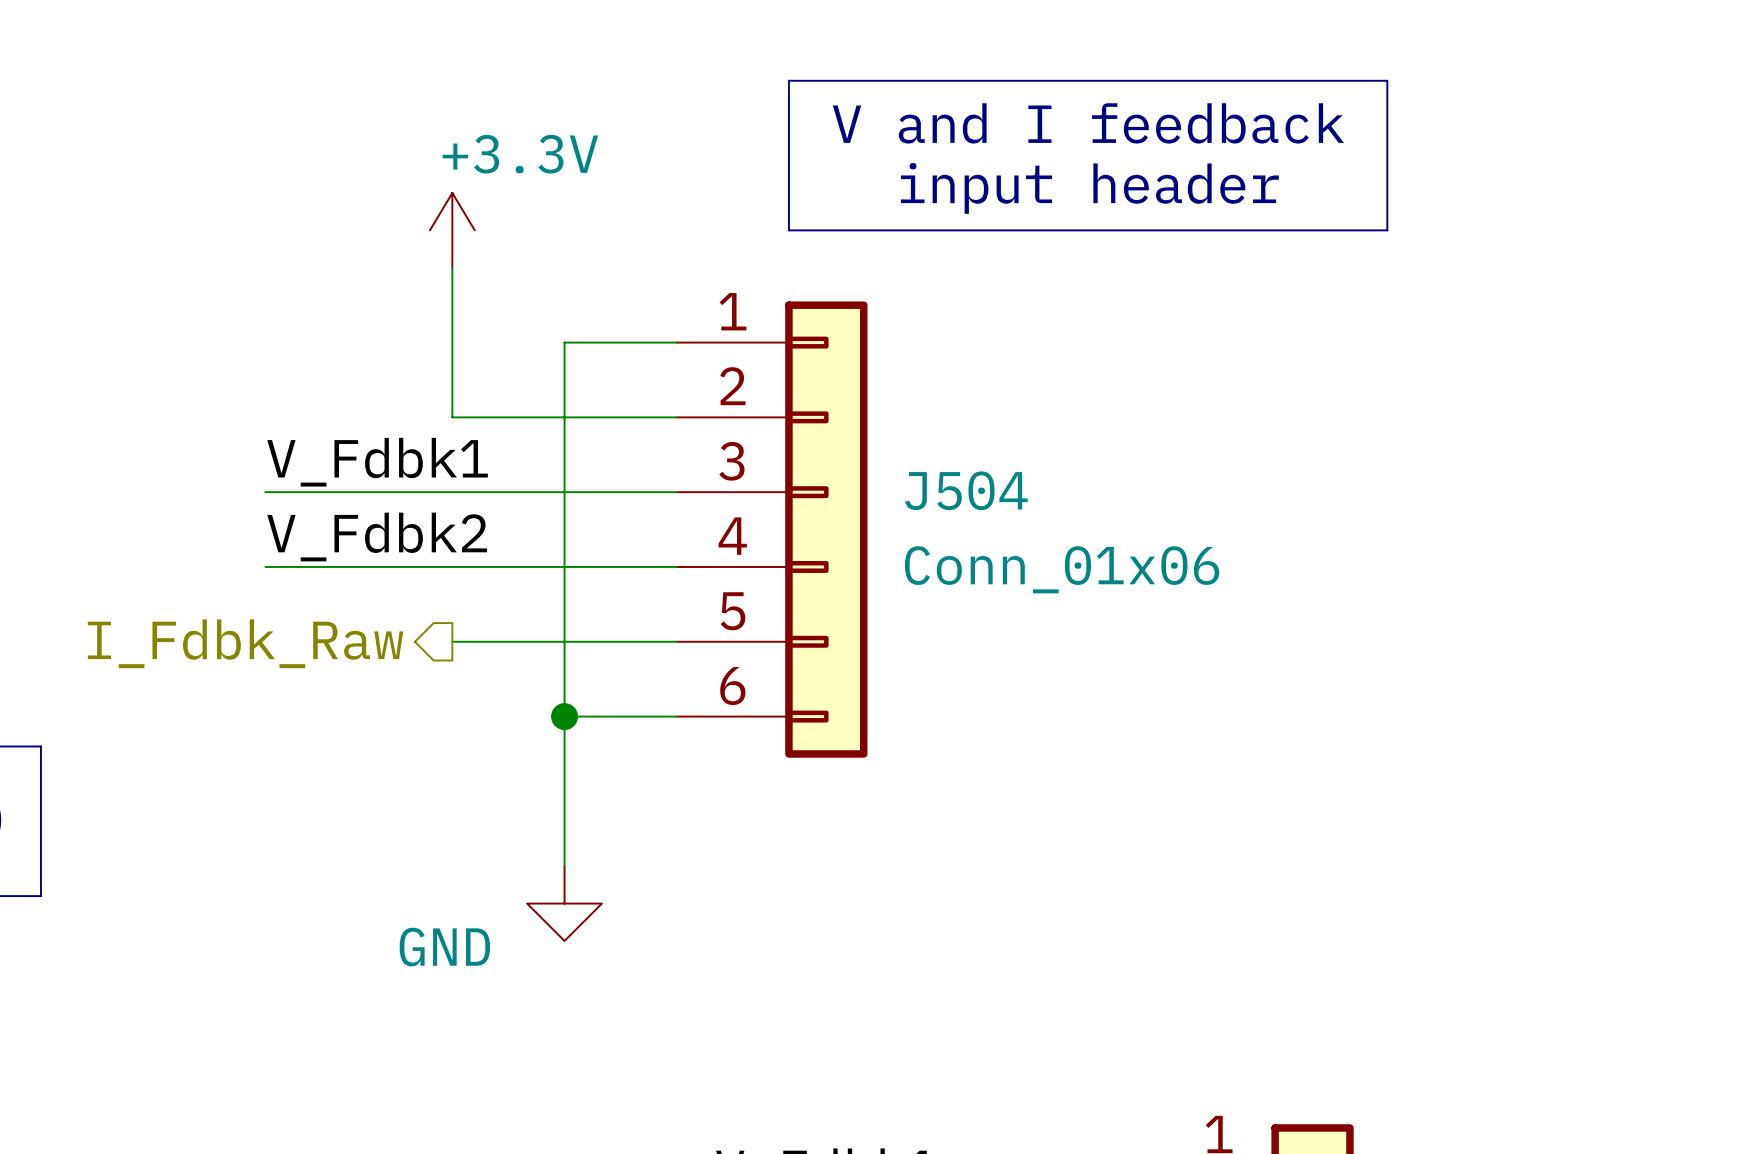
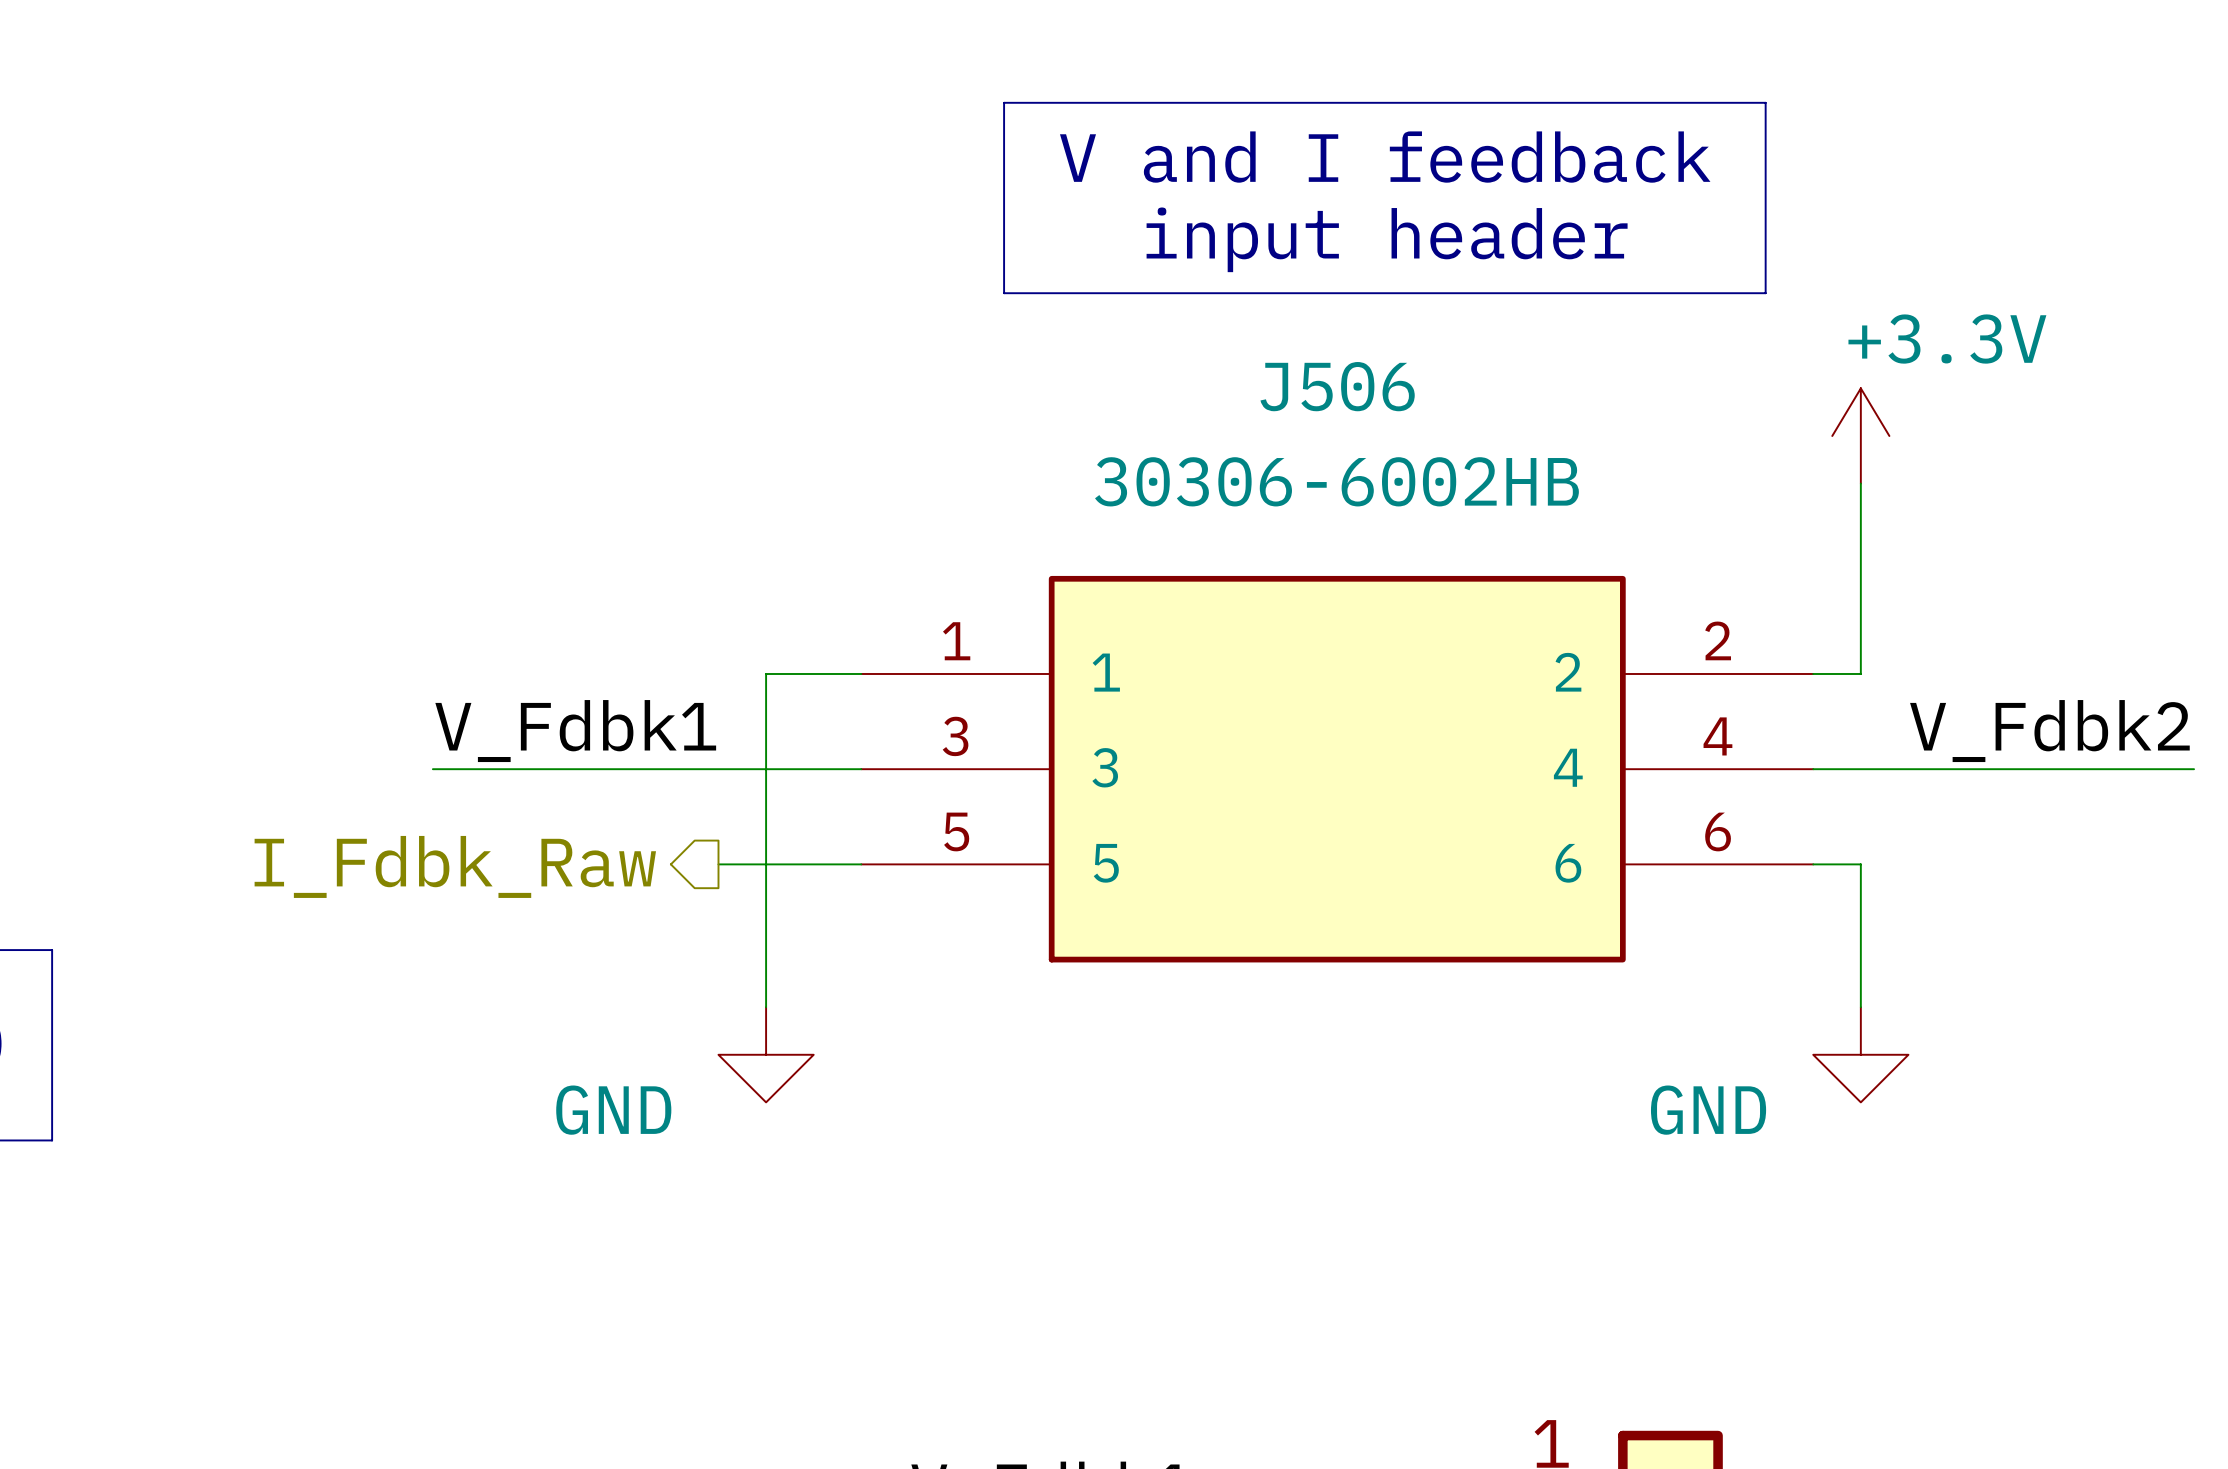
power symbol: +3.3V (452, 230) -> none
wire: (452, 267) (452, 417) (676, 417) -> none
wire: (676, 342) (564, 342) (564, 866) -> none
power symbol: none -> +3.3V (1860, 436)
wire: none -> (1860, 483) (1860, 673) (1813, 673)
label position: V_Fdbk1 (377, 462) -> V_Fdbk1 (575, 731)
wire: (265, 492) (676, 492) -> none
wire: none -> (861, 673) (766, 673) (766, 1007)
J504: Conn_01x06 (772, 529) -> none
label: V_Fdbk2 (377, 537) -> none
wire: (265, 566) (676, 566) -> none
label: none -> V_Fdbk2 (2049, 731)
wire: none -> (432, 769) (861, 769)
J506: none -> 30306-6002HB (1337, 769)
wire: none -> (1813, 769) (2194, 769)
wire: (452, 641) (676, 641) -> none
hierarchical label position: I_Fdbk_Raw (245, 643) -> I_Fdbk_Raw (455, 866)
wire: none -> (1813, 864) (1860, 864) (1860, 1007)
wire: (564, 716) (676, 716) -> (718, 864) (861, 864)
junction: (564, 716) -> none
power symbol: none -> GND (1860, 1054)
power symbol position: GND (564, 903) -> GND (766, 1054)

